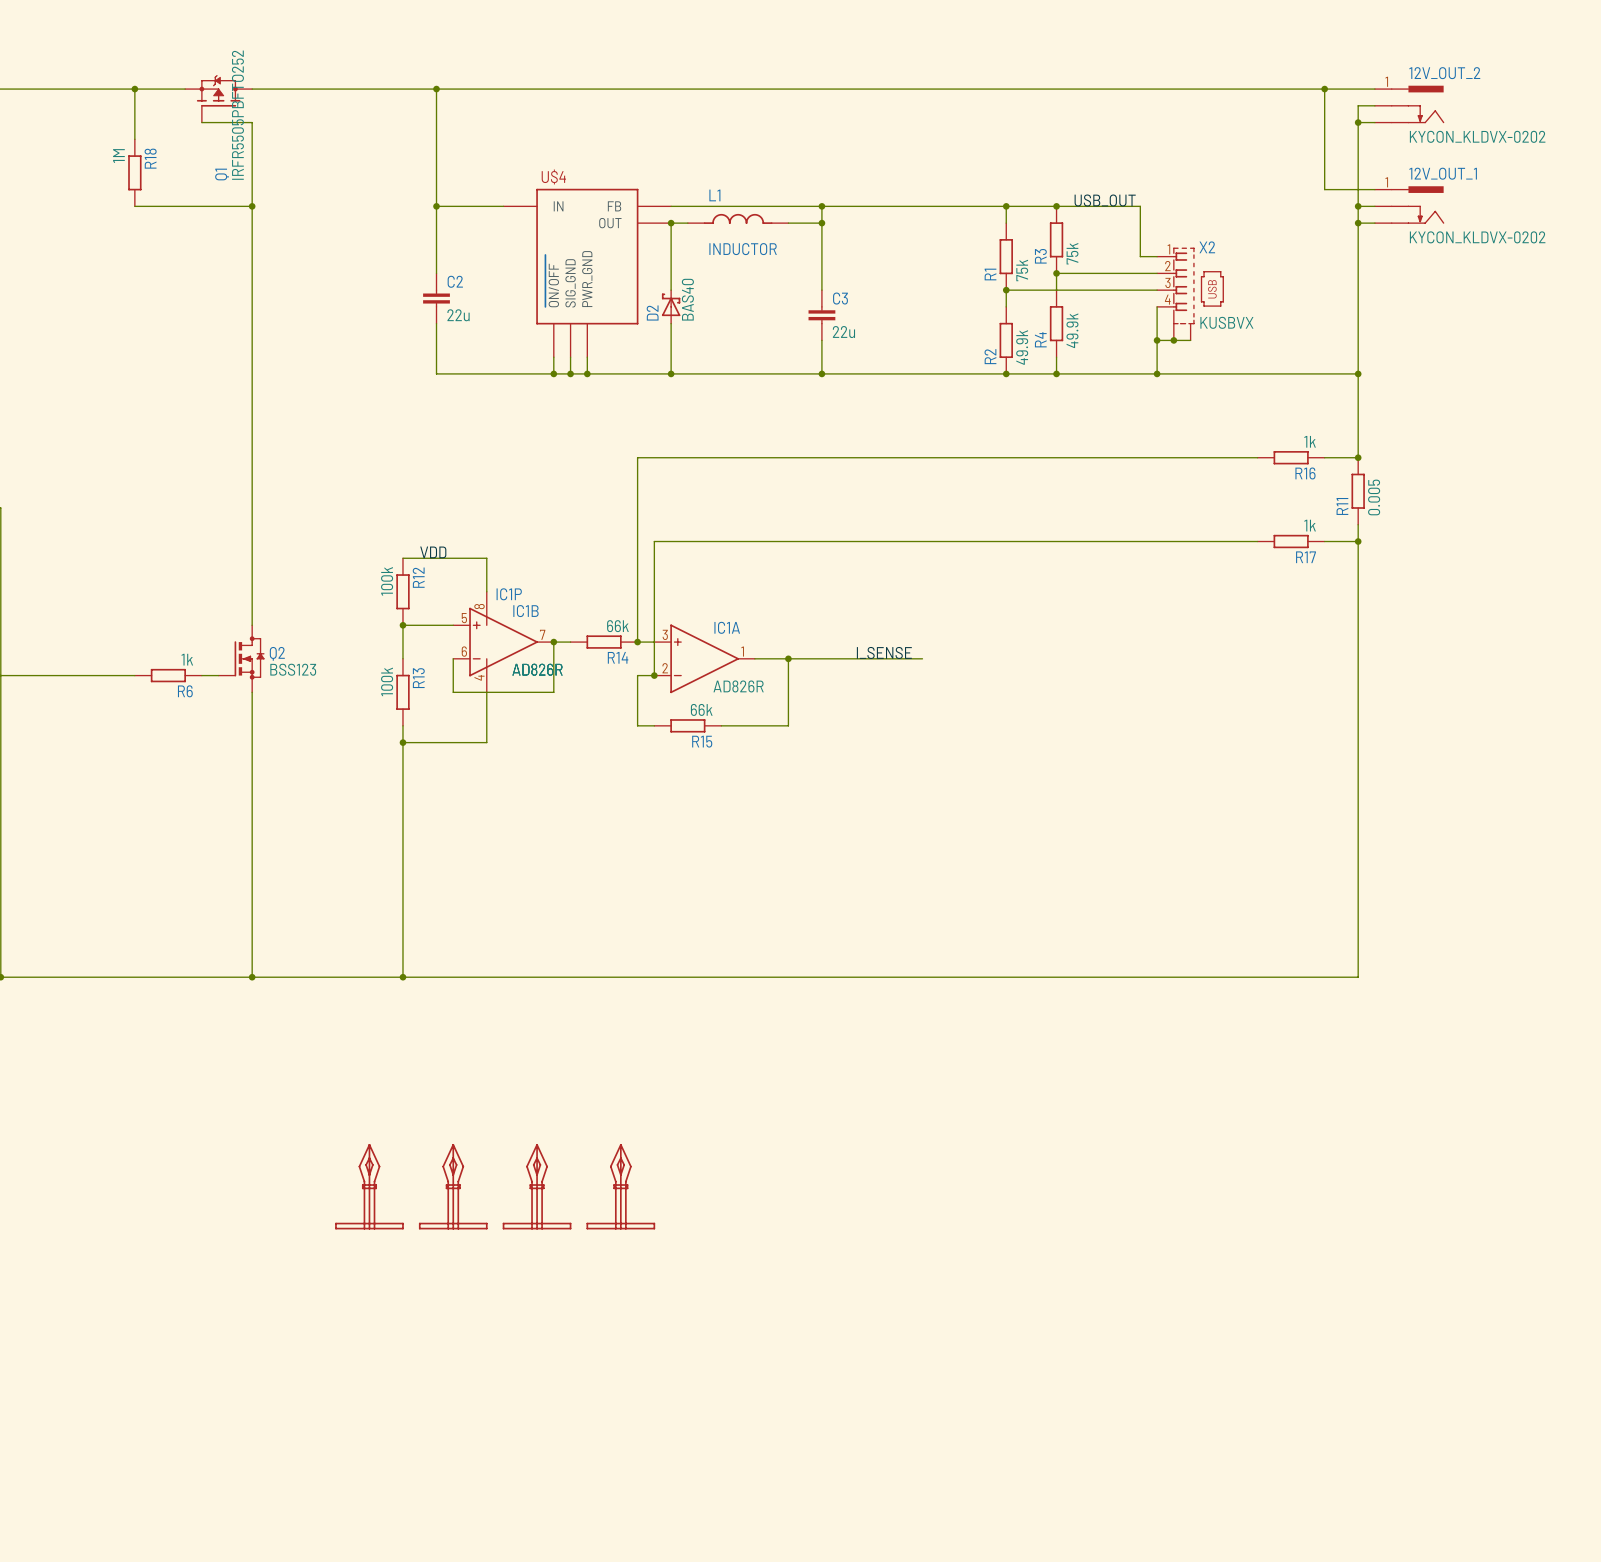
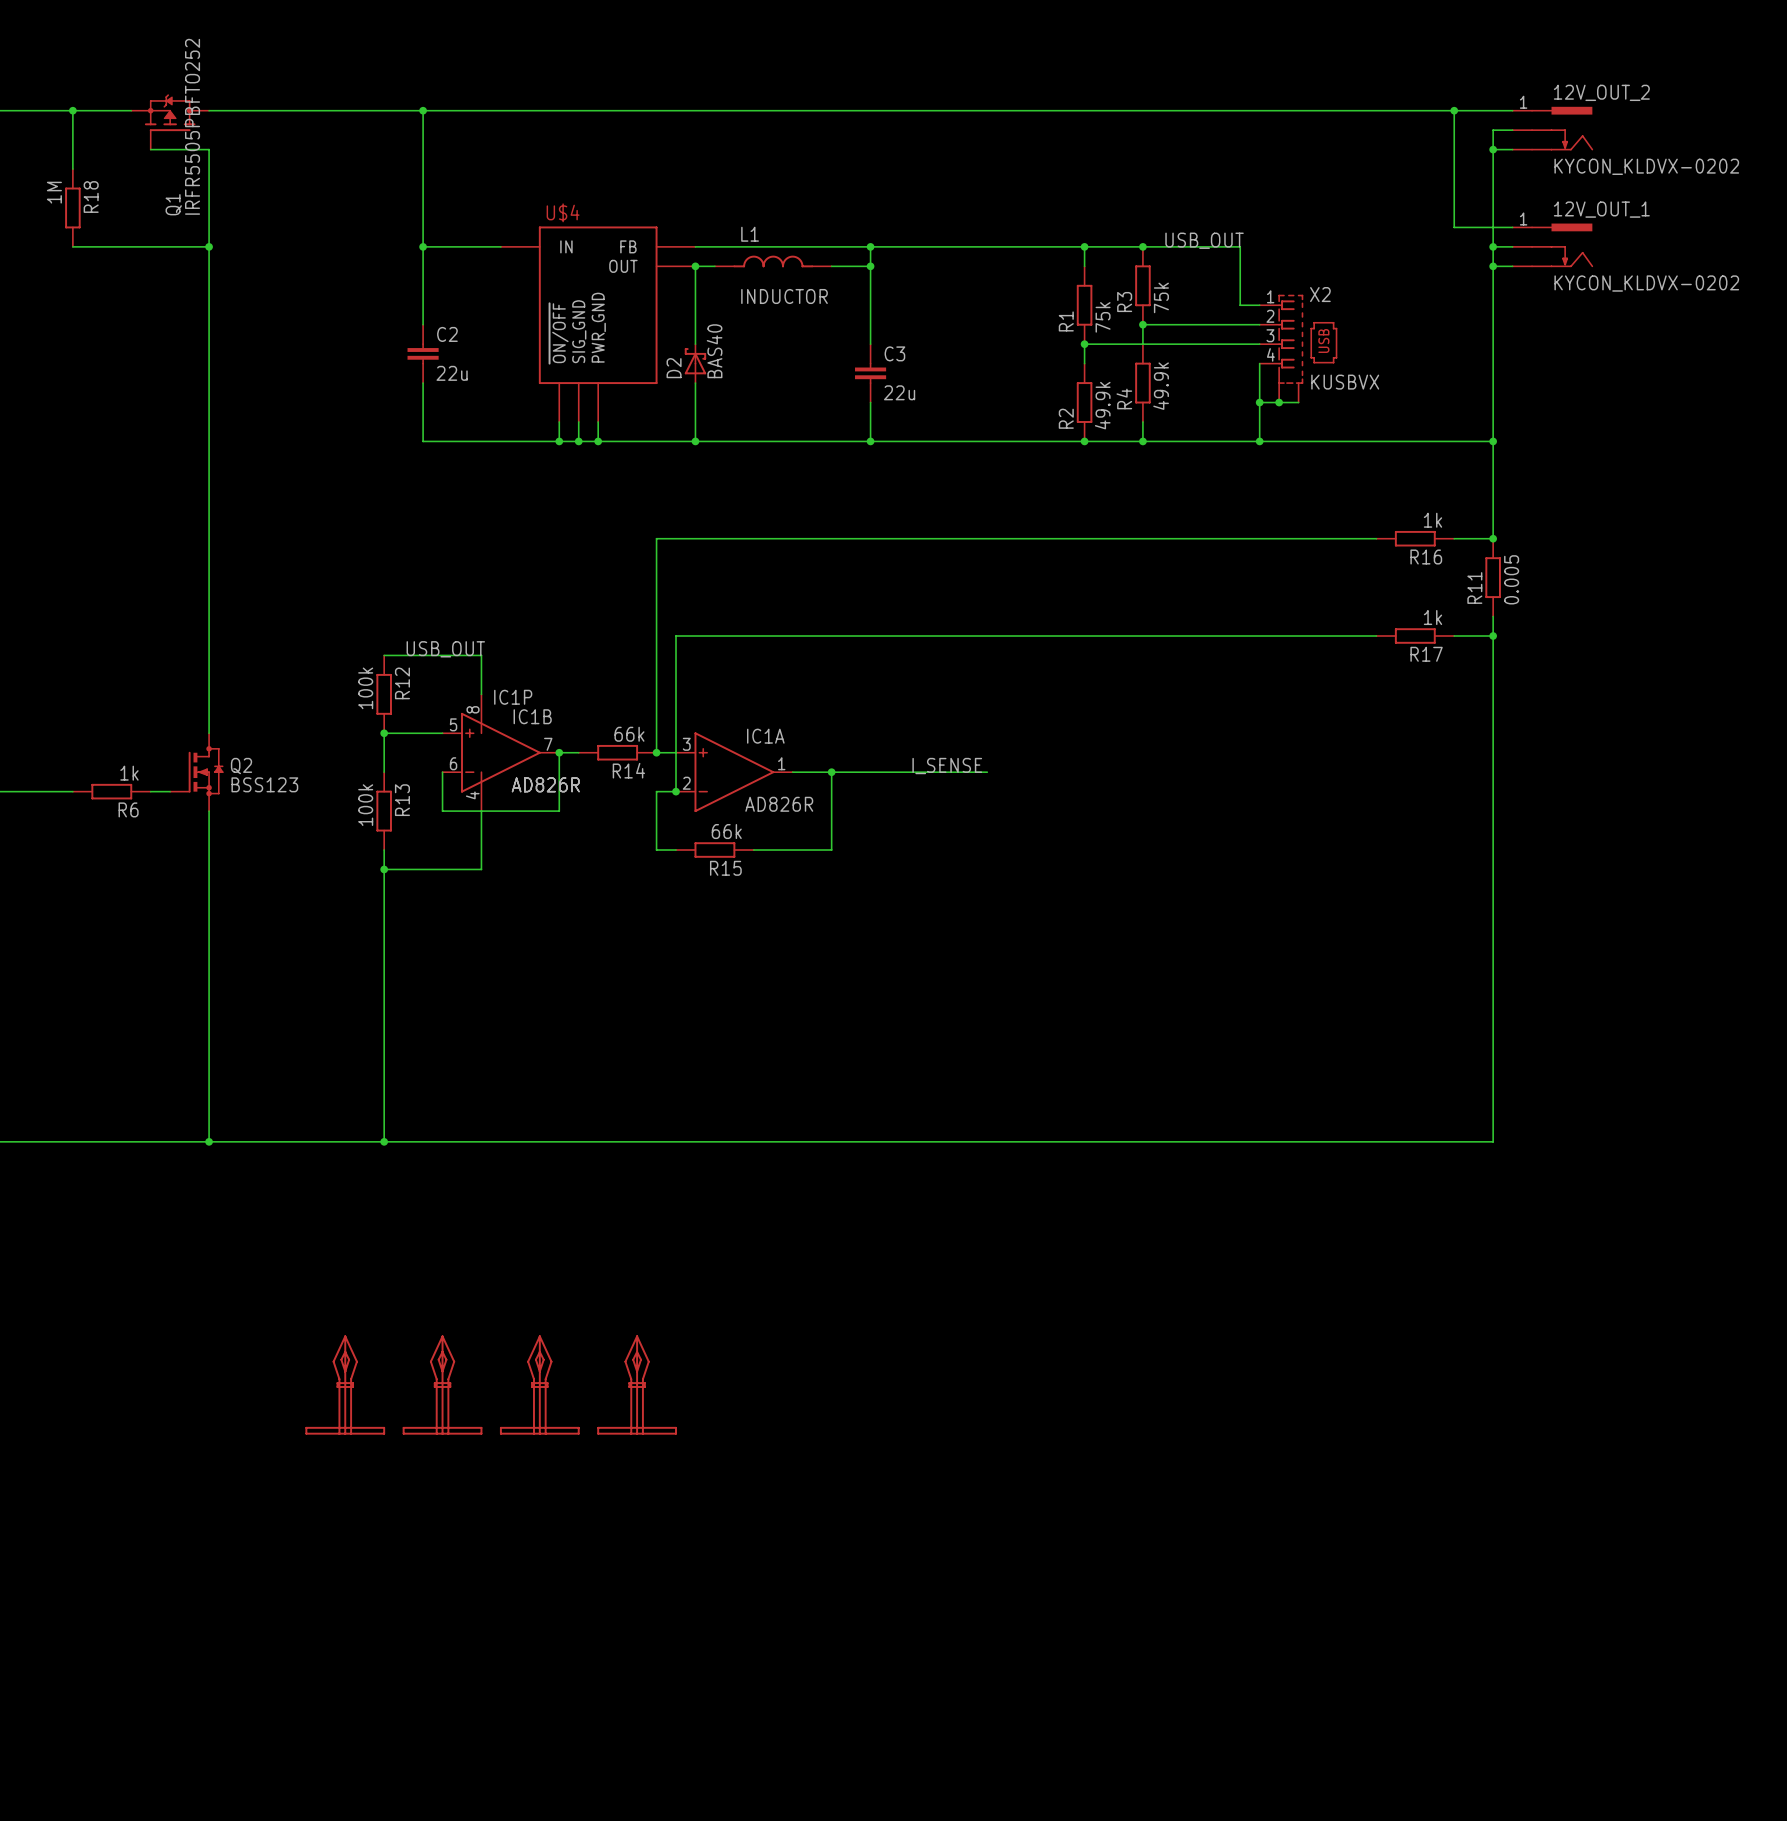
label: VDD (433, 552) -> USB_OUT (445, 649)

